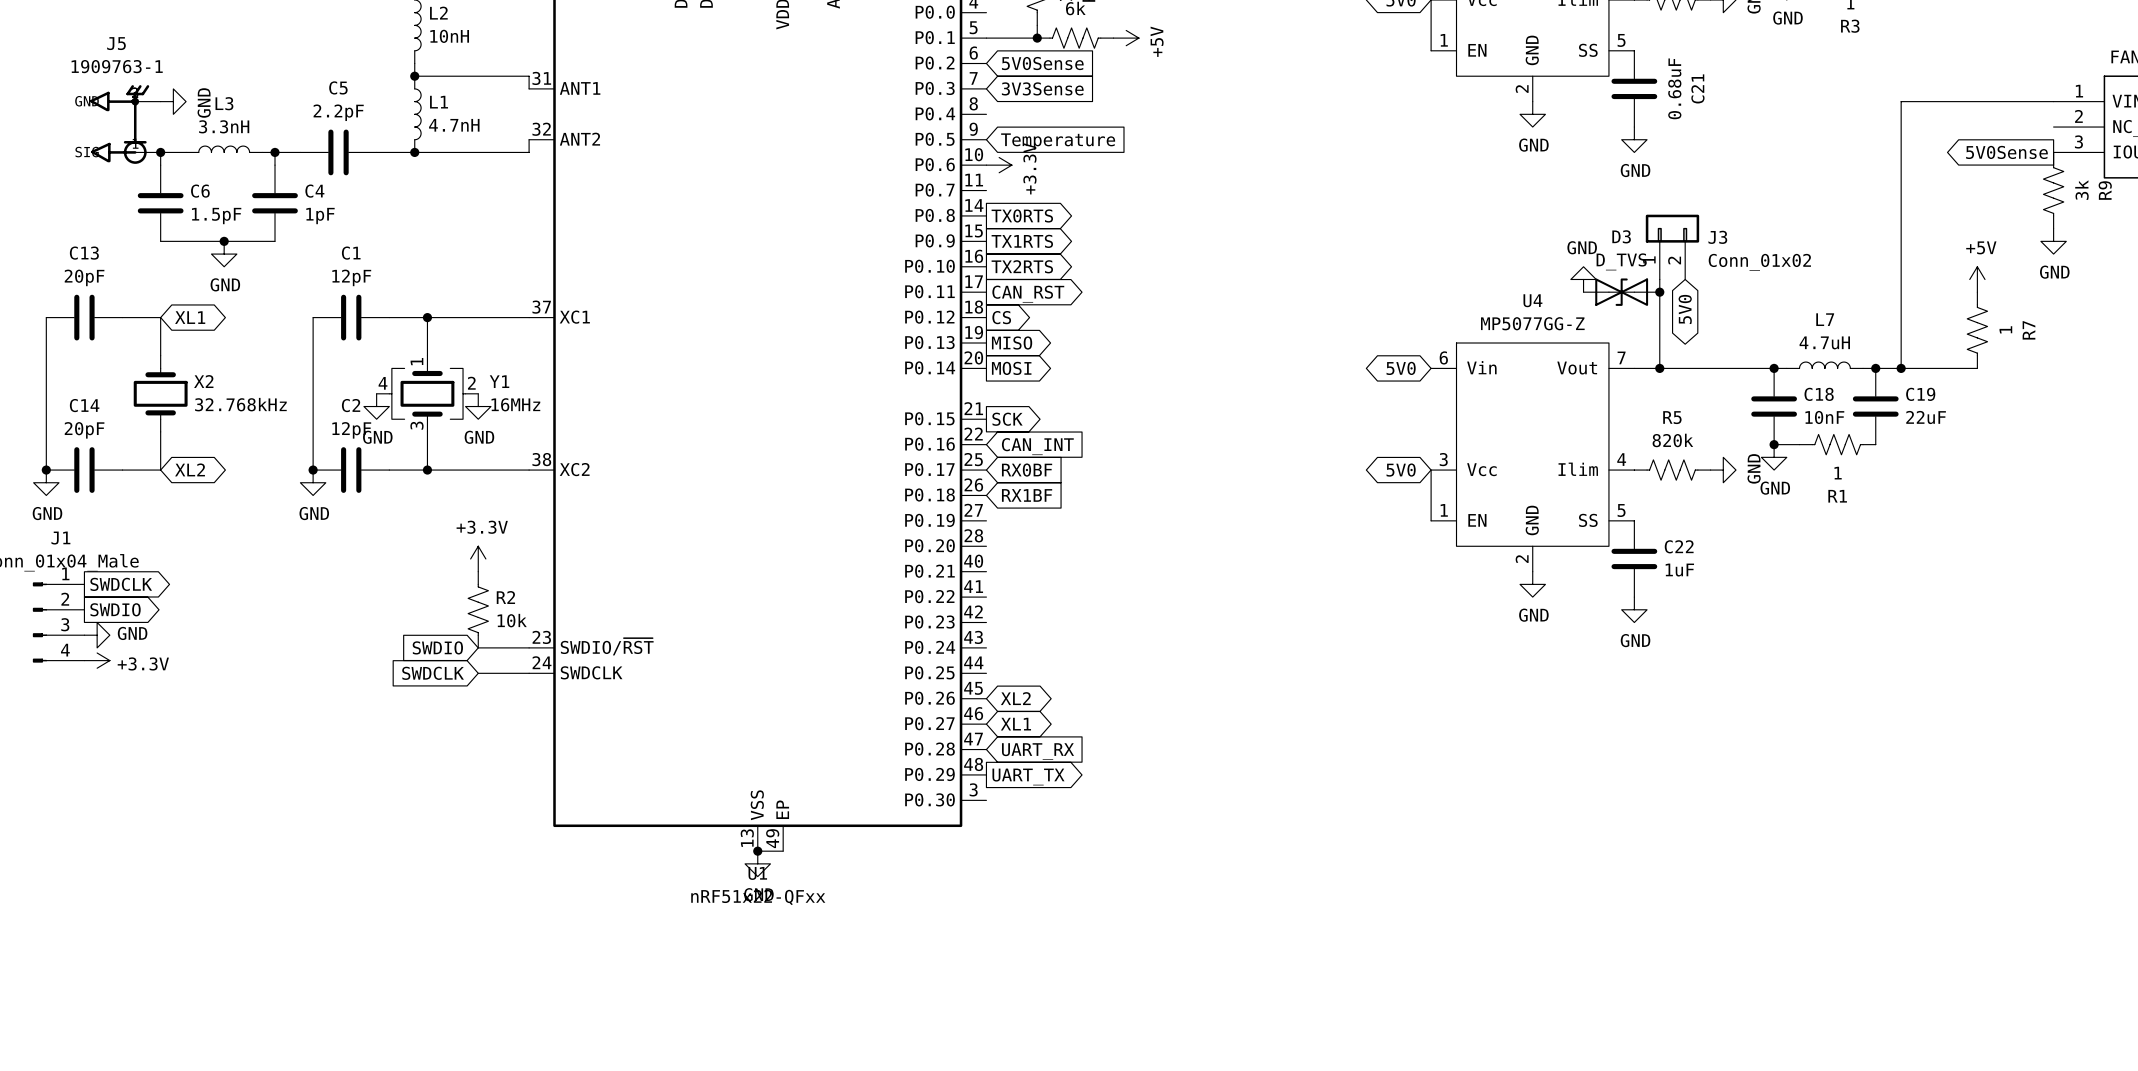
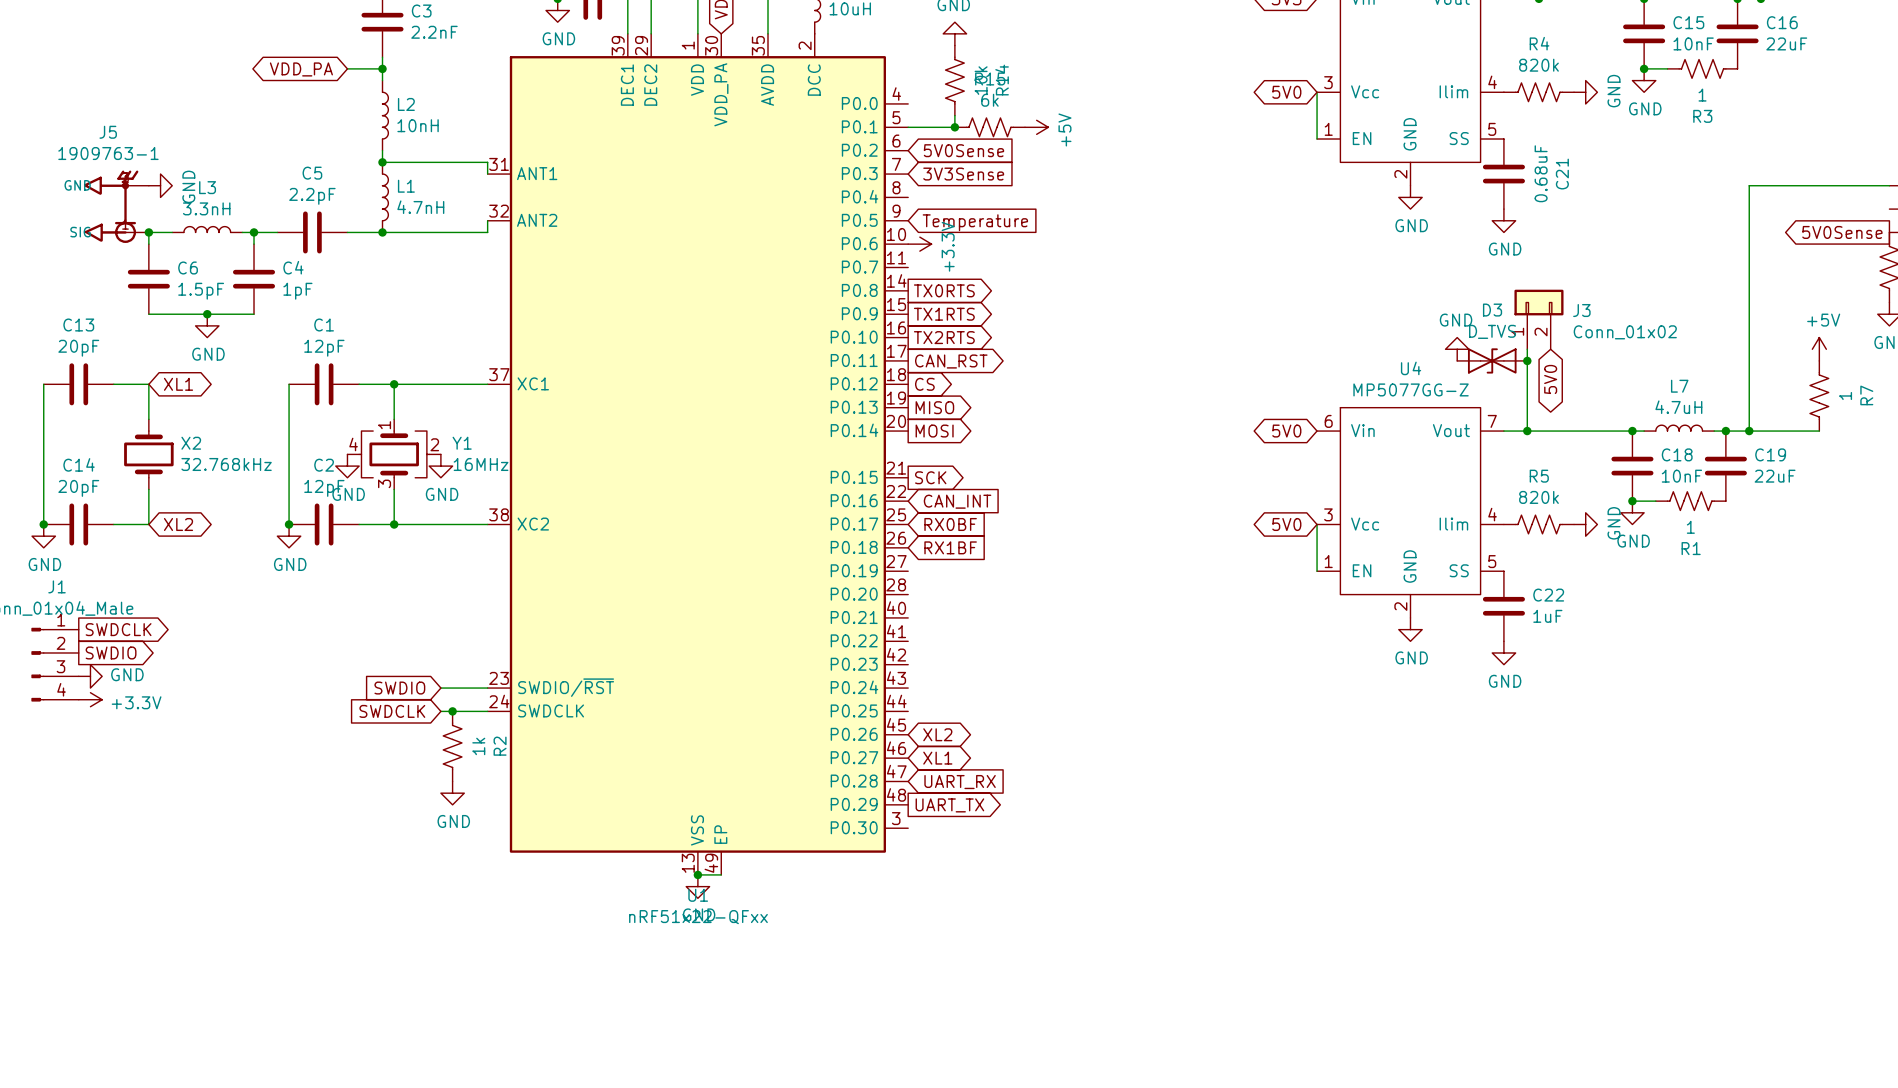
power symbol: +3.3V (478, 558) -> none
R2 name rotation: 0° (505, 597) -> 90° counterclockwise (500, 746)
R2 position: (478, 609) -> (452, 746)
R2 value: 10k (512, 620) -> 1k (478, 746)
junction: none -> (452, 711)
power symbol: none -> GND (452, 793)

